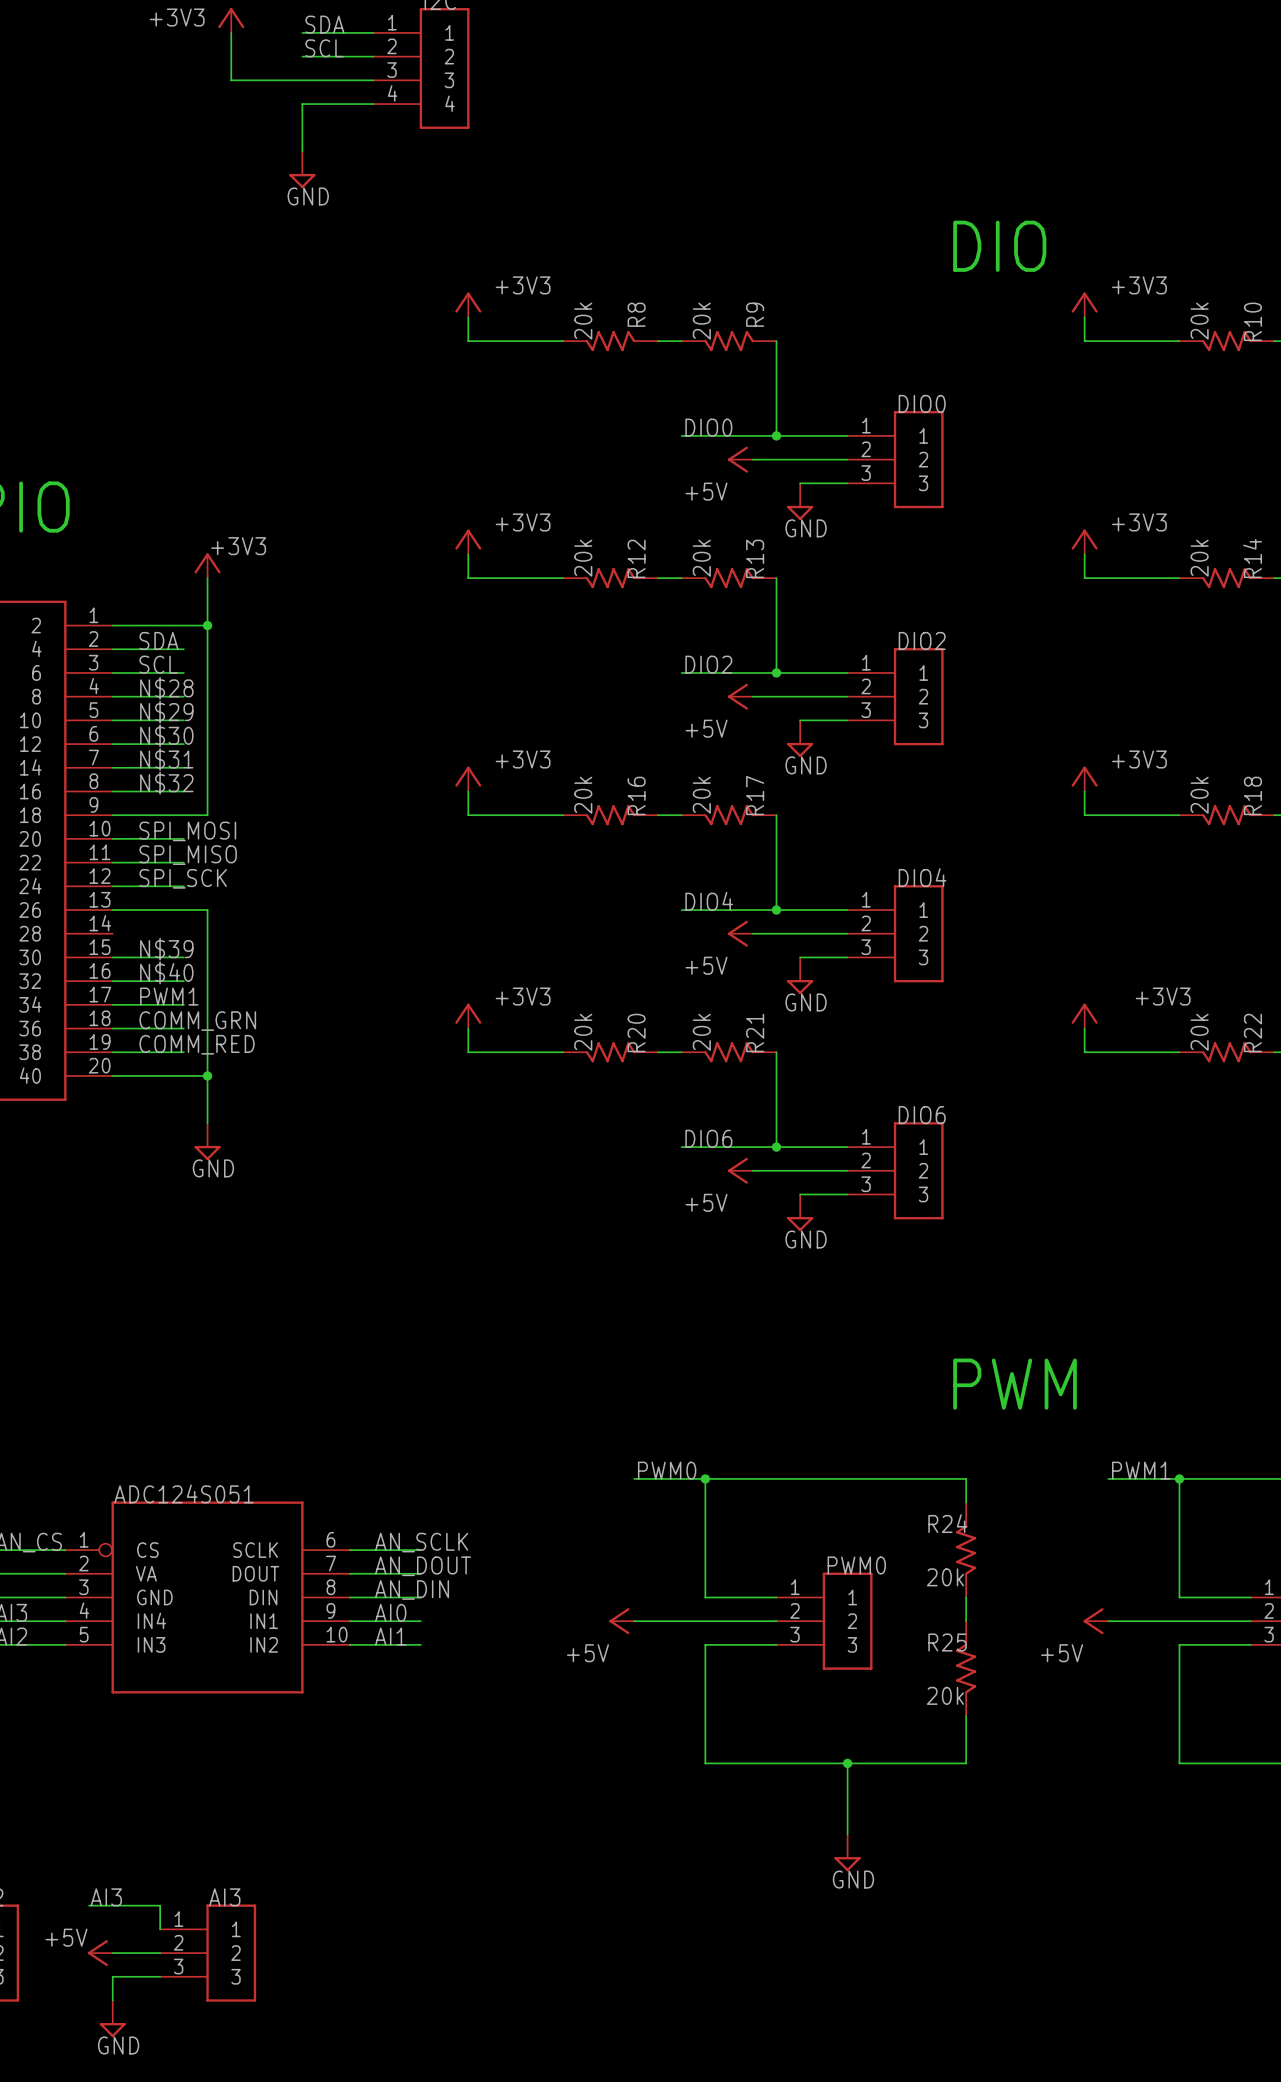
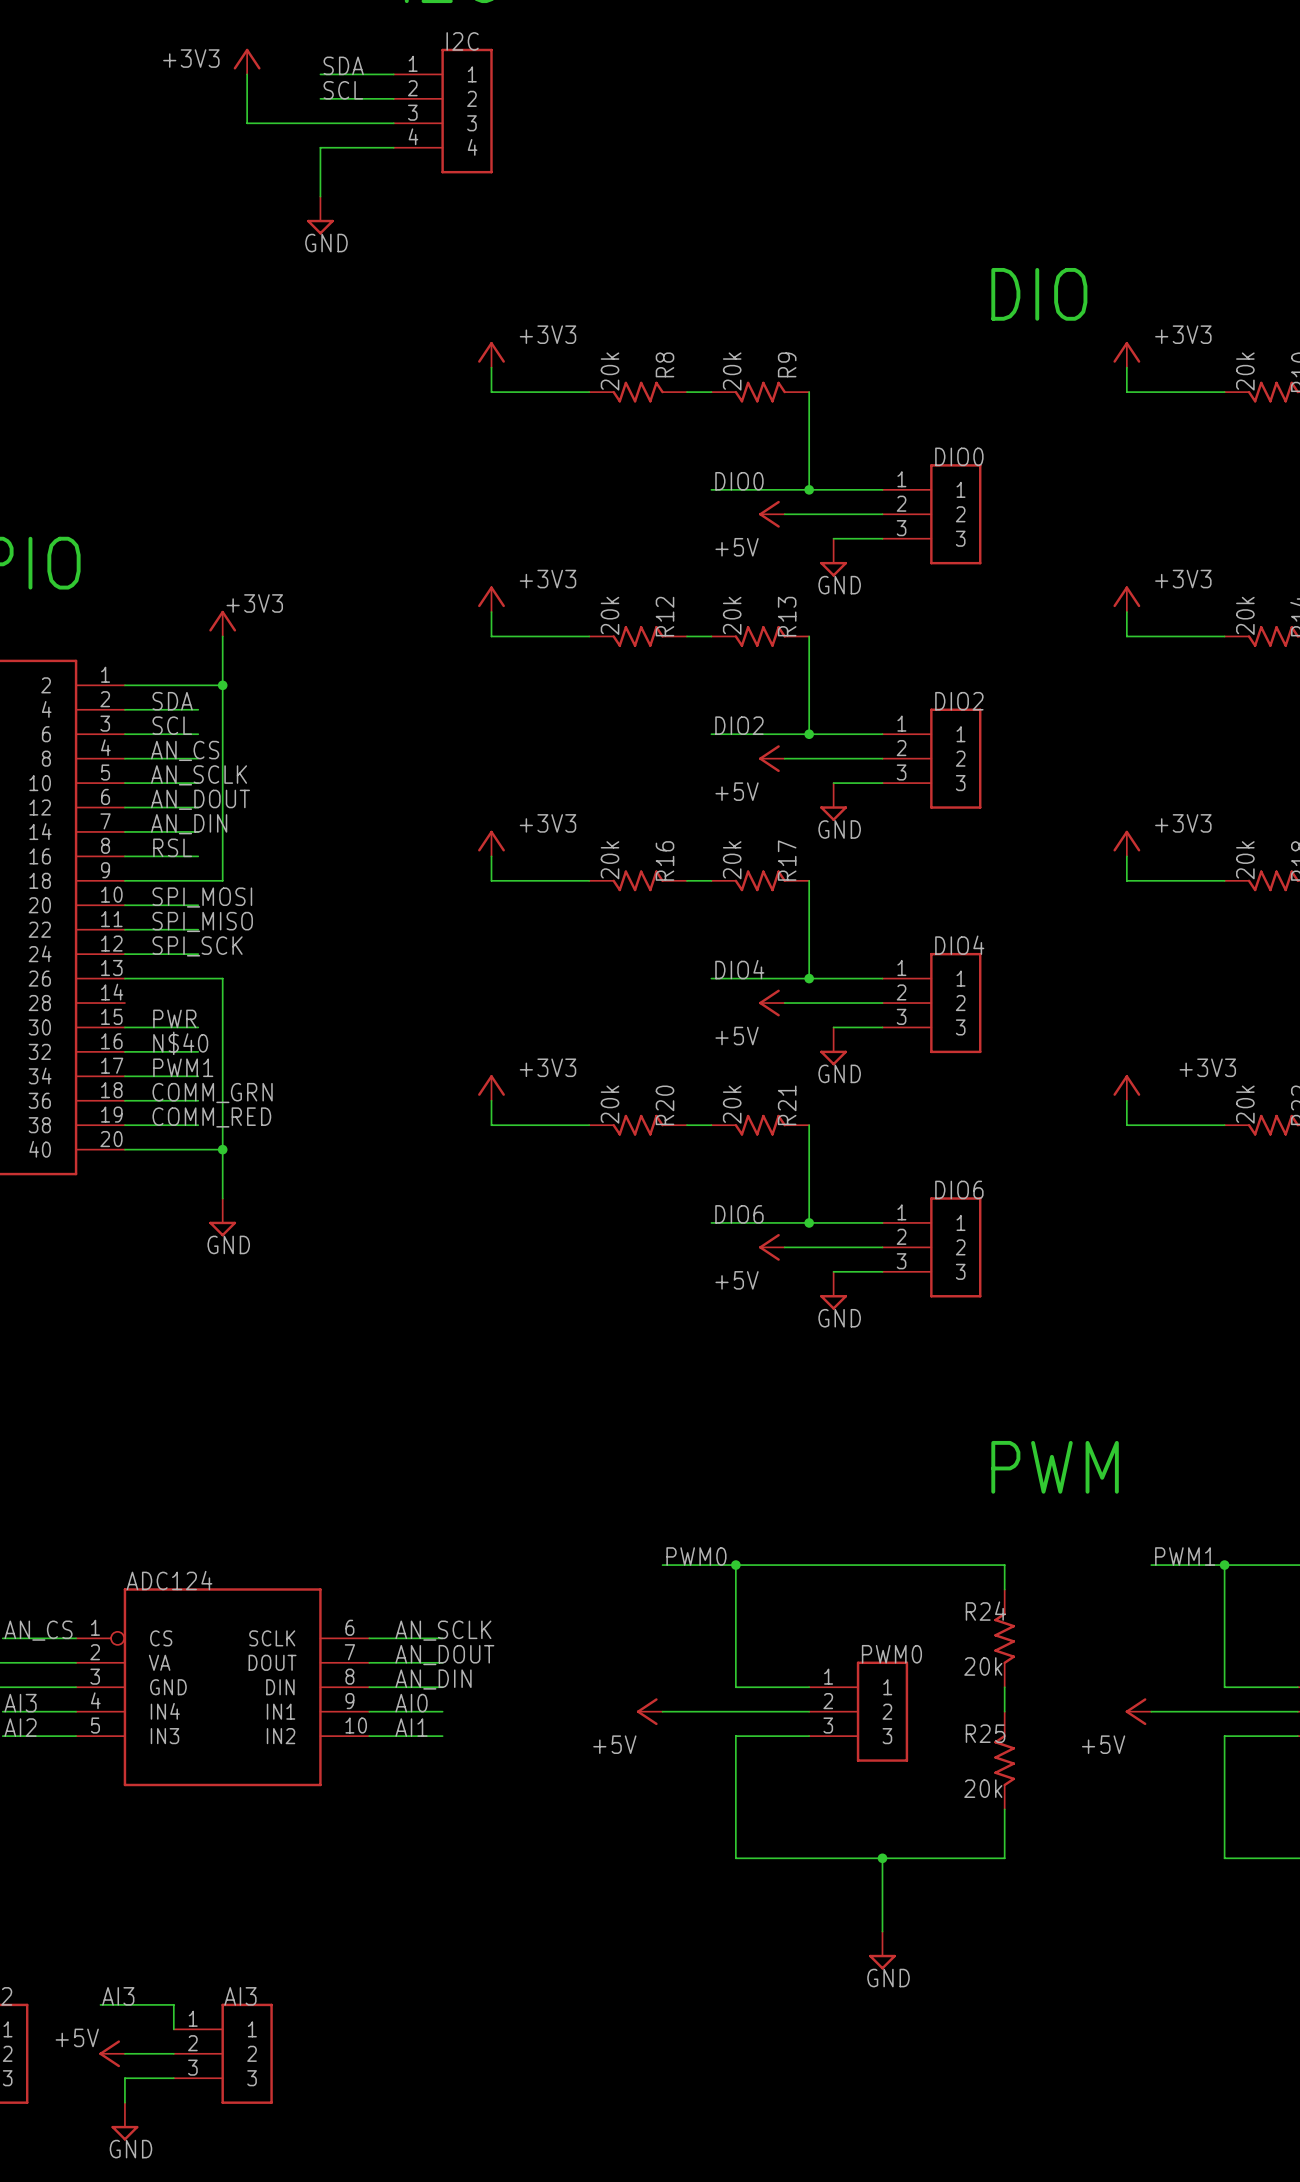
label: N$28 (166, 688) -> AN_CS (185, 750)
label: N$29 (166, 712) -> AN_SCLK (199, 775)
label: N$30 (166, 735) -> AN_DOUT (200, 799)
label: N$31 (166, 759) -> AN_DIN (189, 824)
label: N$32 (166, 783) -> RSL (172, 847)
label: N$39 (166, 949) -> PWR (174, 1018)
ADC124S051 name: ADC124S051 (184, 1493) -> ADC124 (169, 1580)

